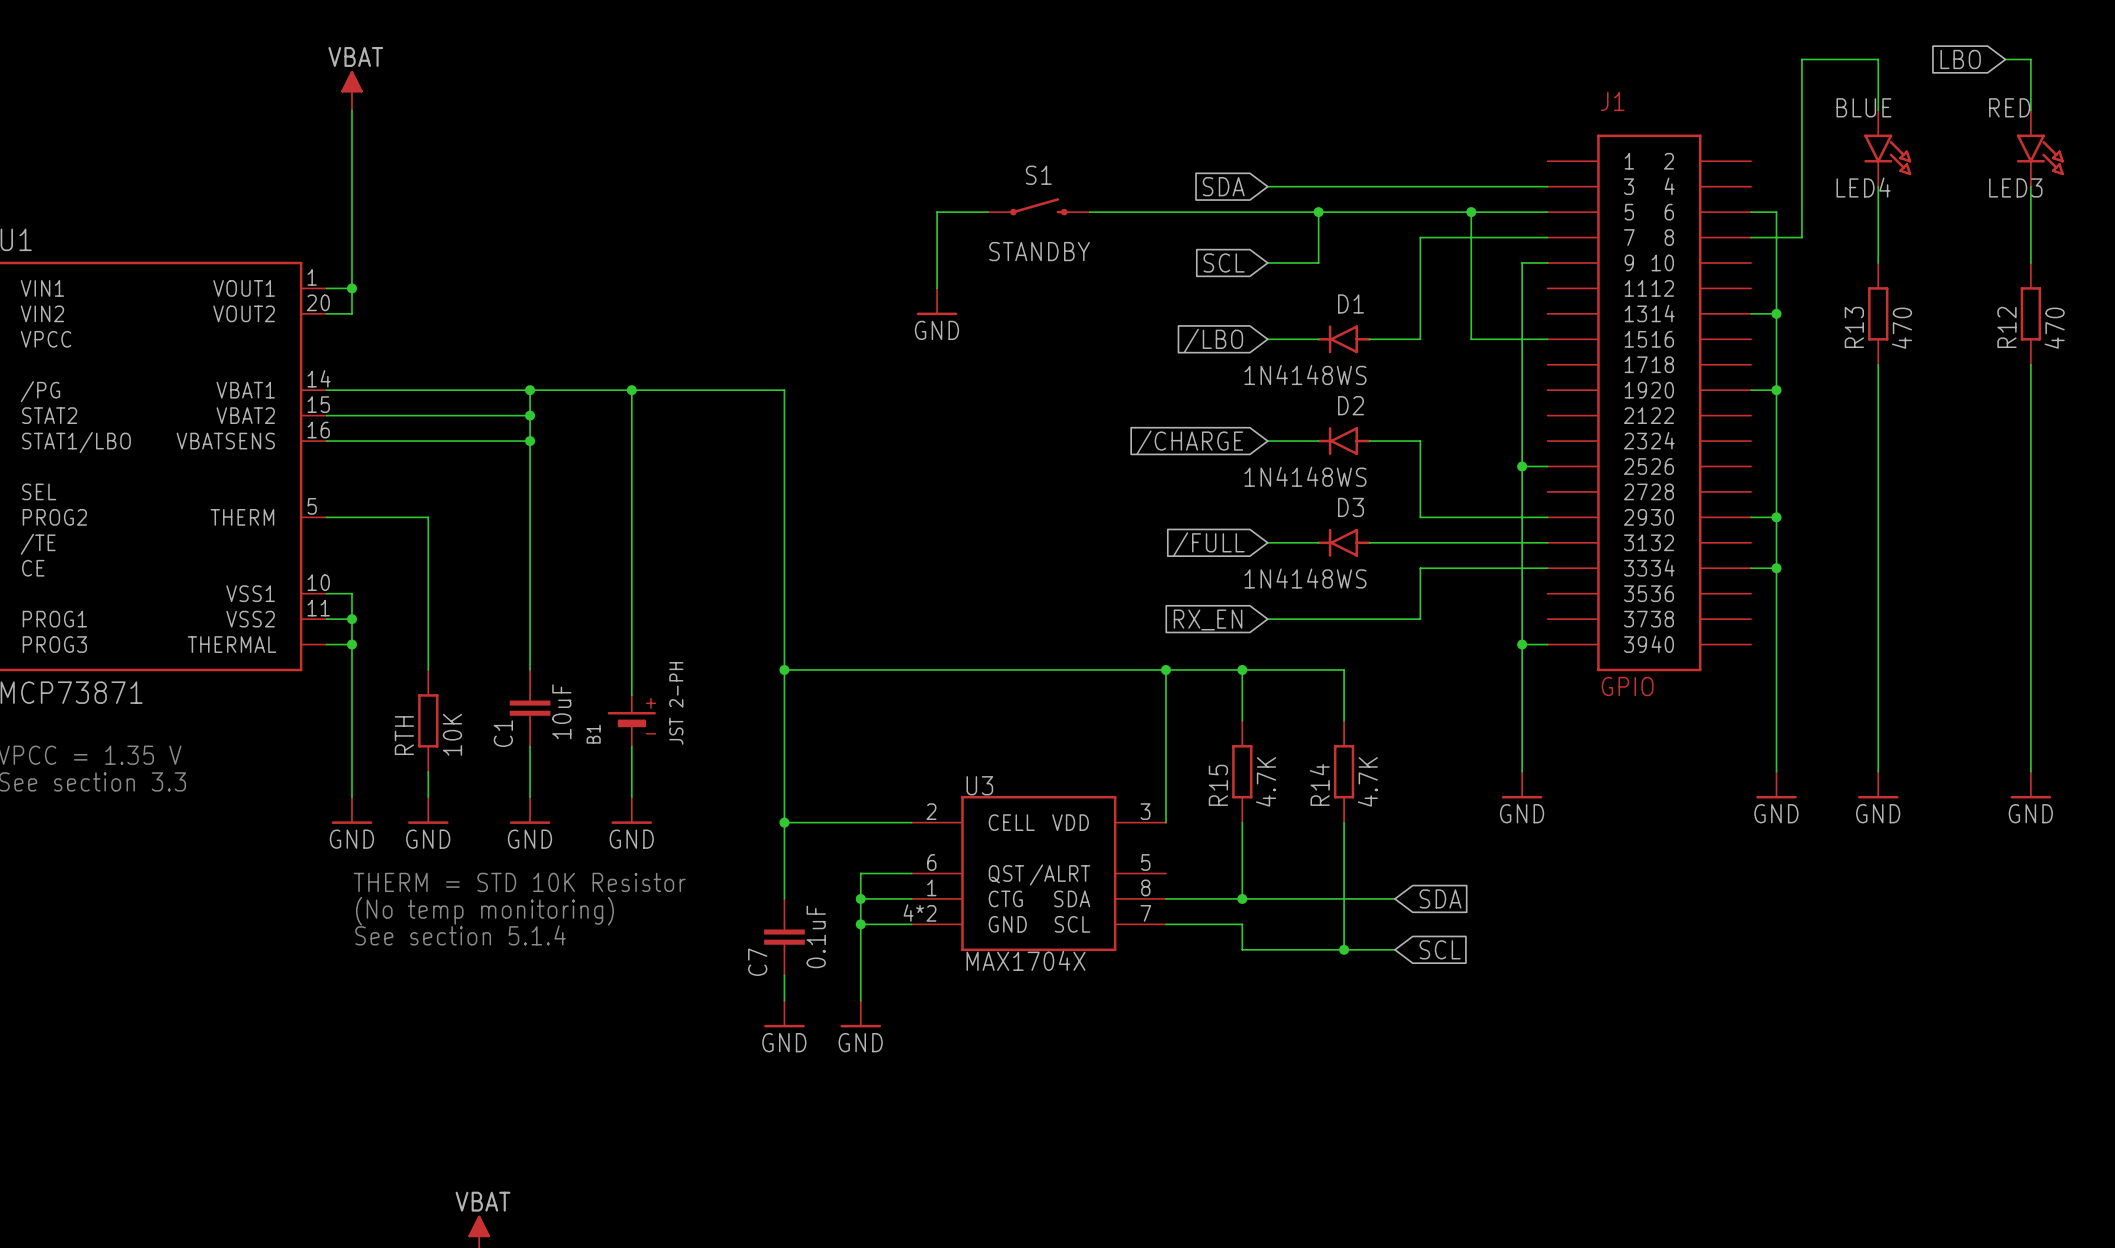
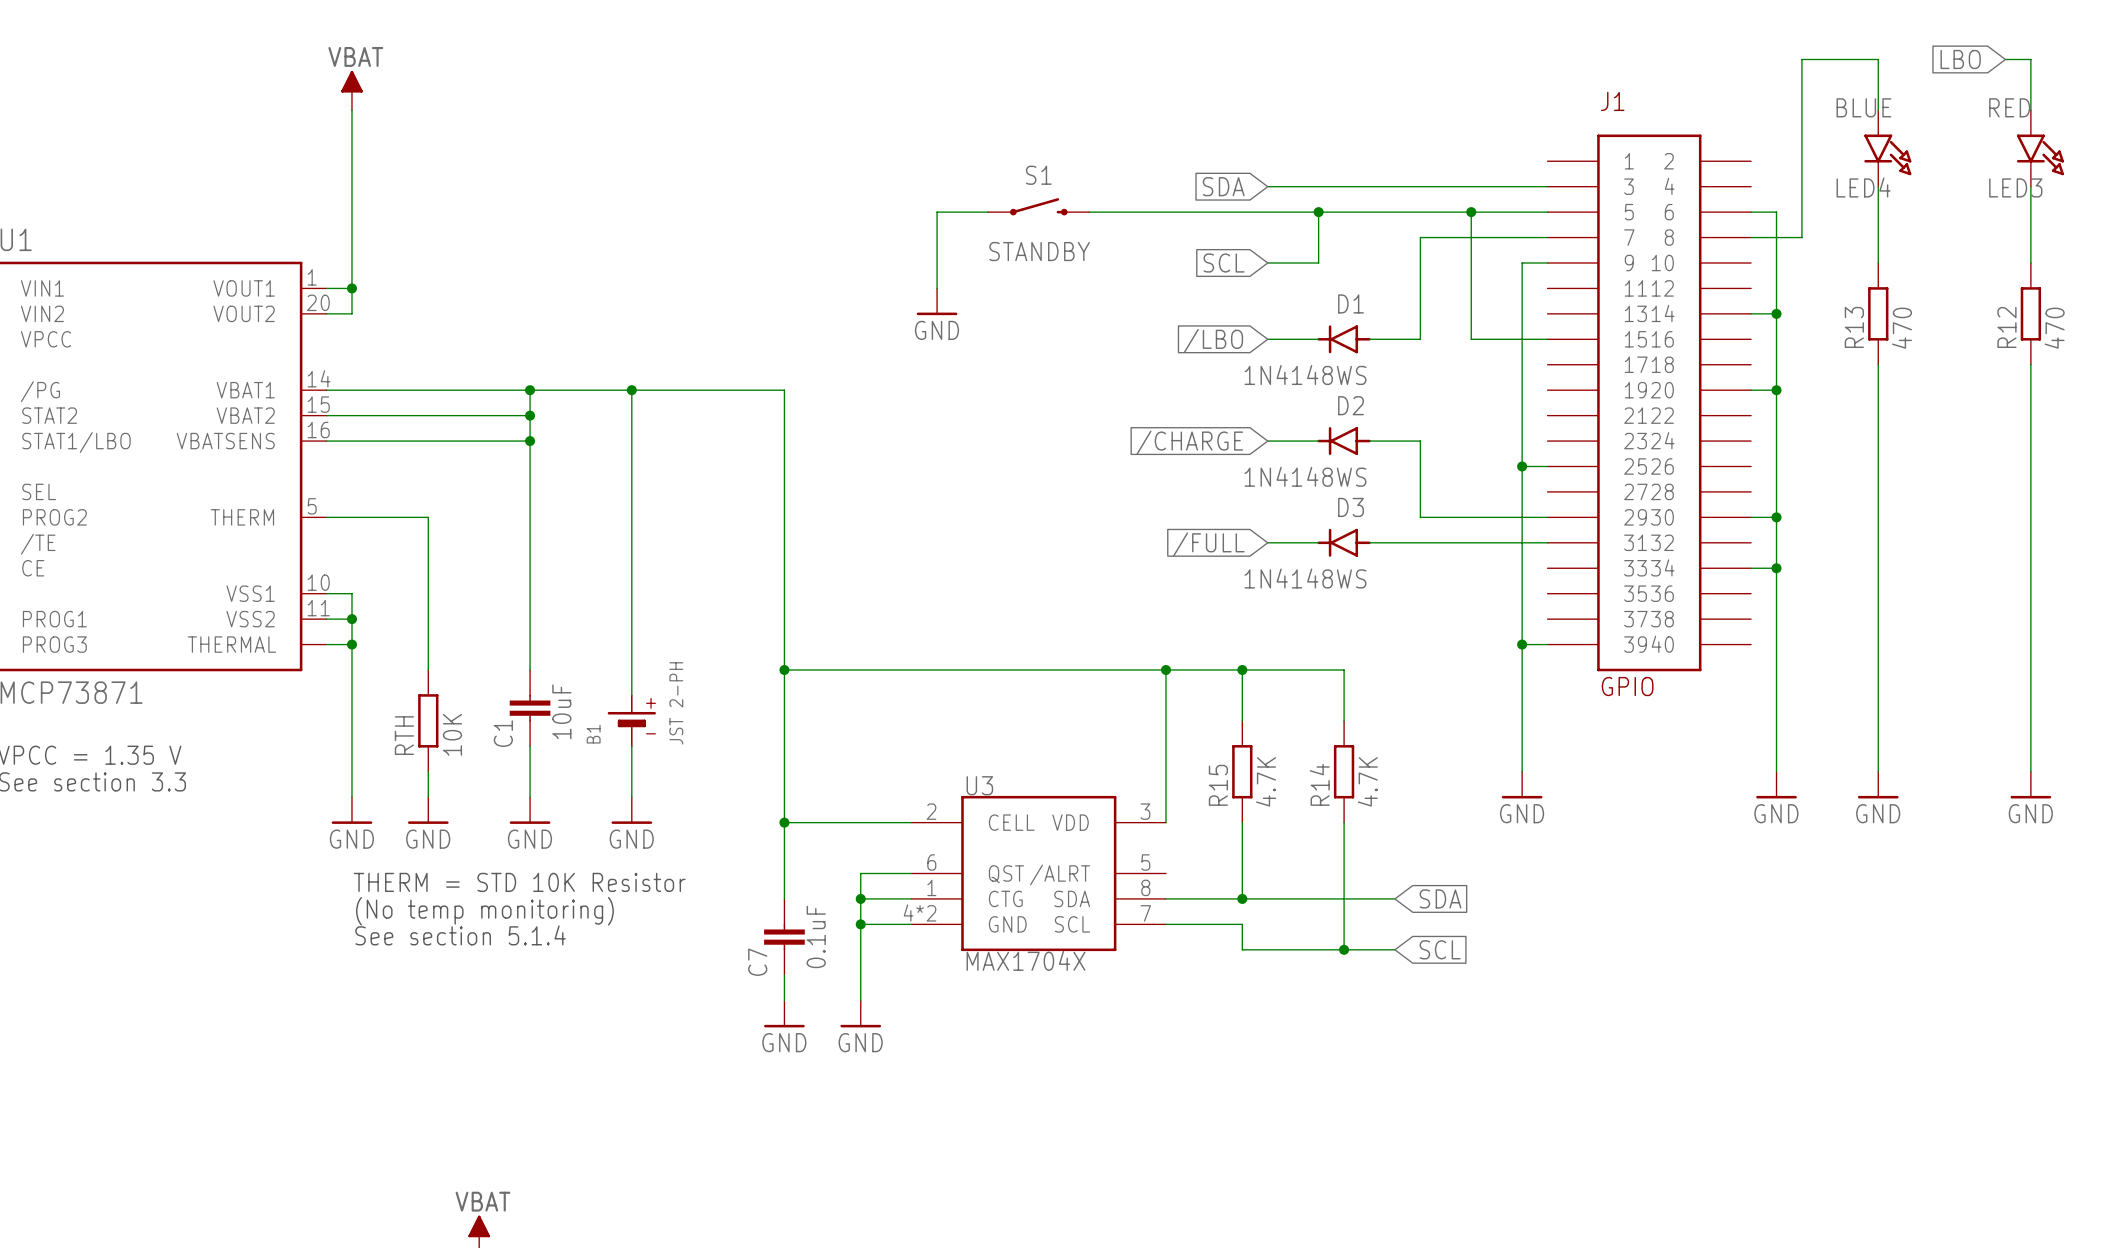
wire: (1547, 568) (1420, 568) (1420, 619) (1267, 619) -> none
global label: RX_EN (1208, 619) -> none

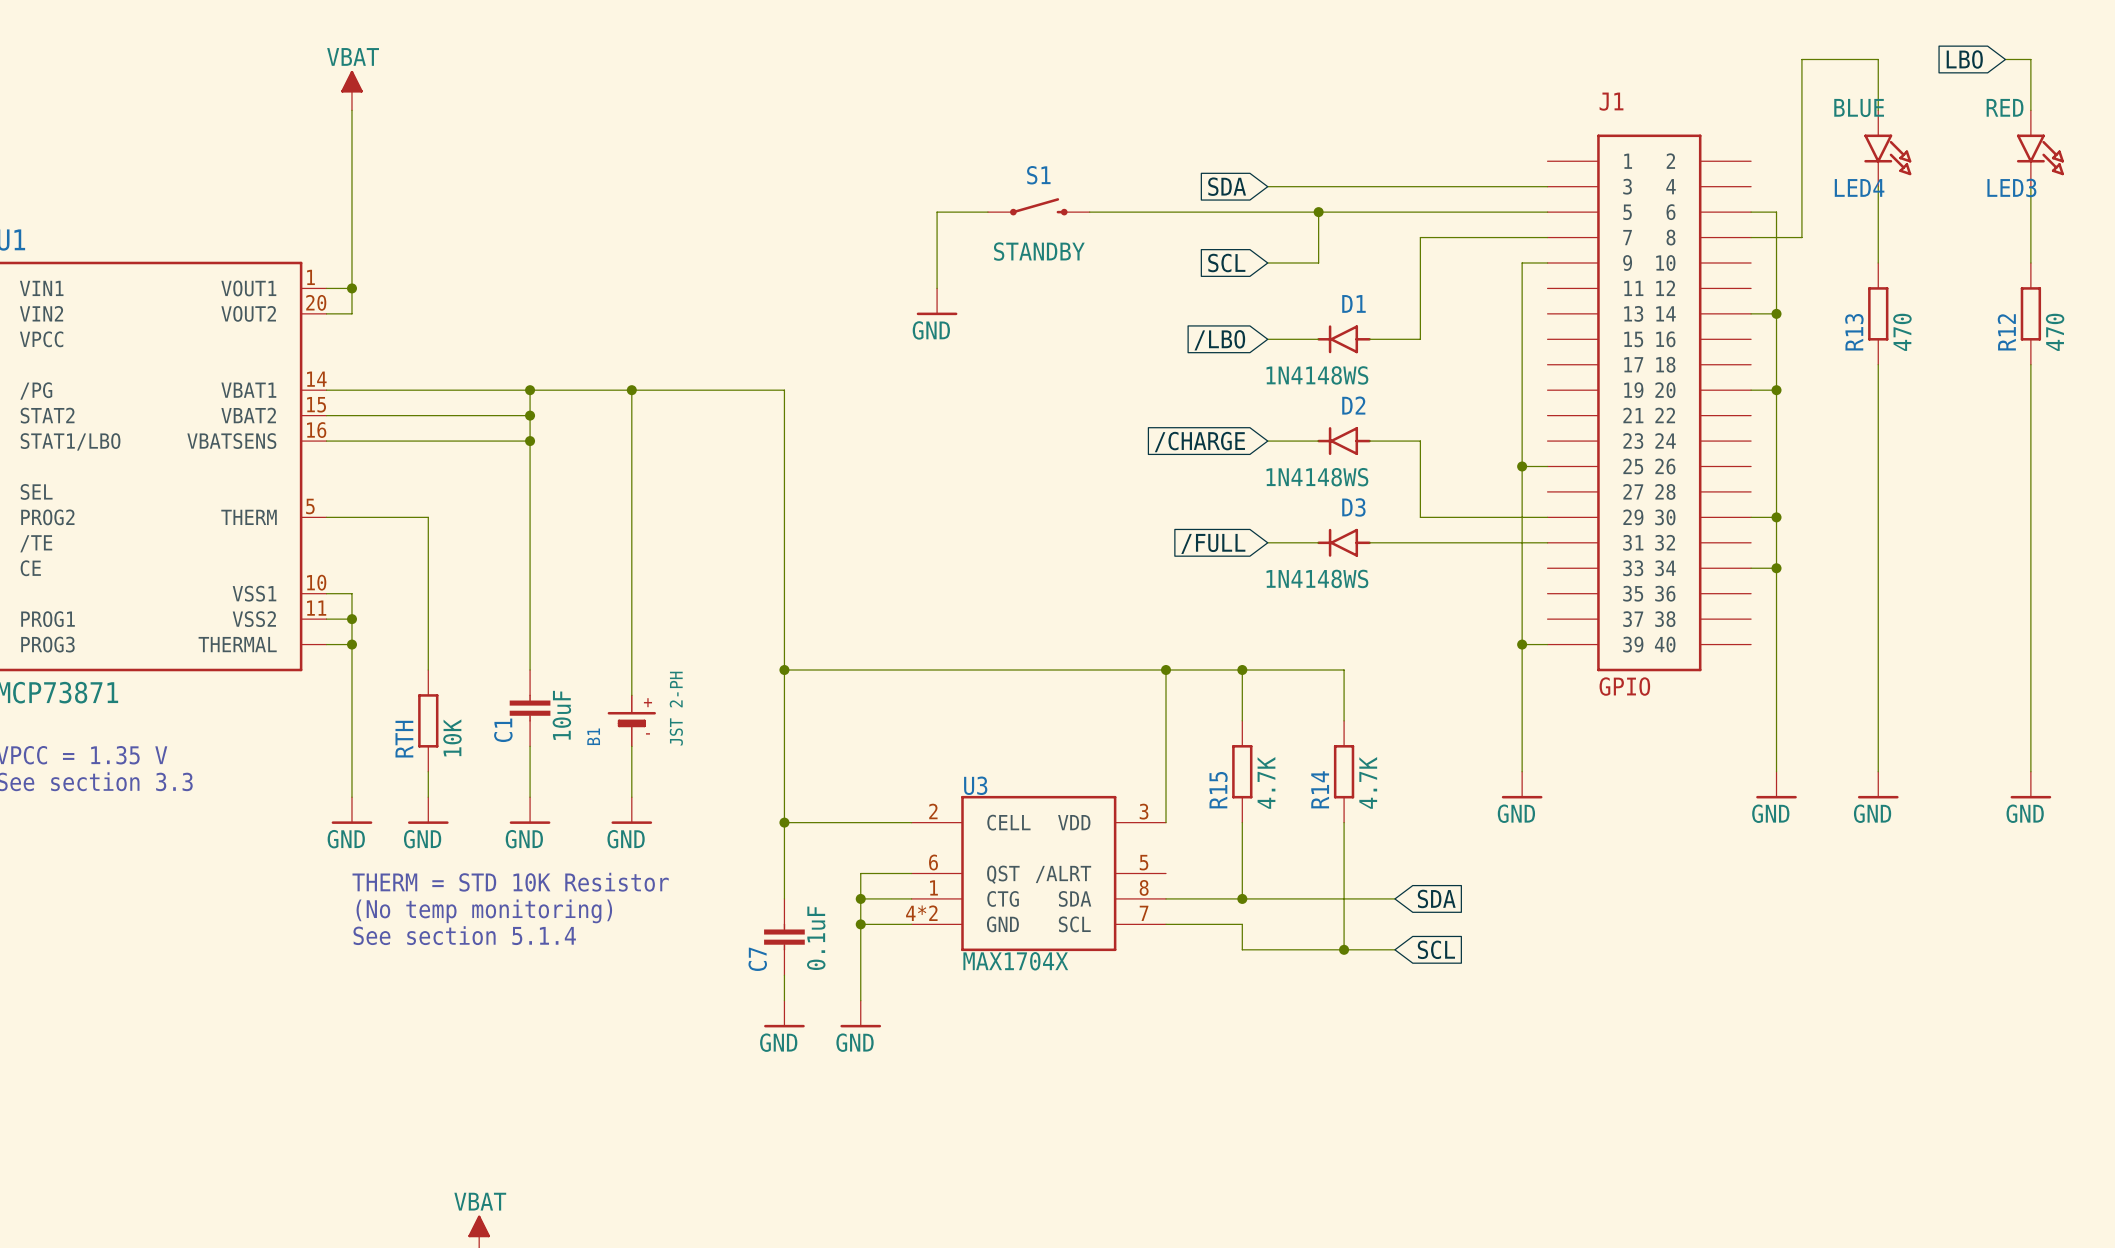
wire: (1471, 212) (1471, 339) (1547, 339) -> none
junction: (1471, 212) -> none

